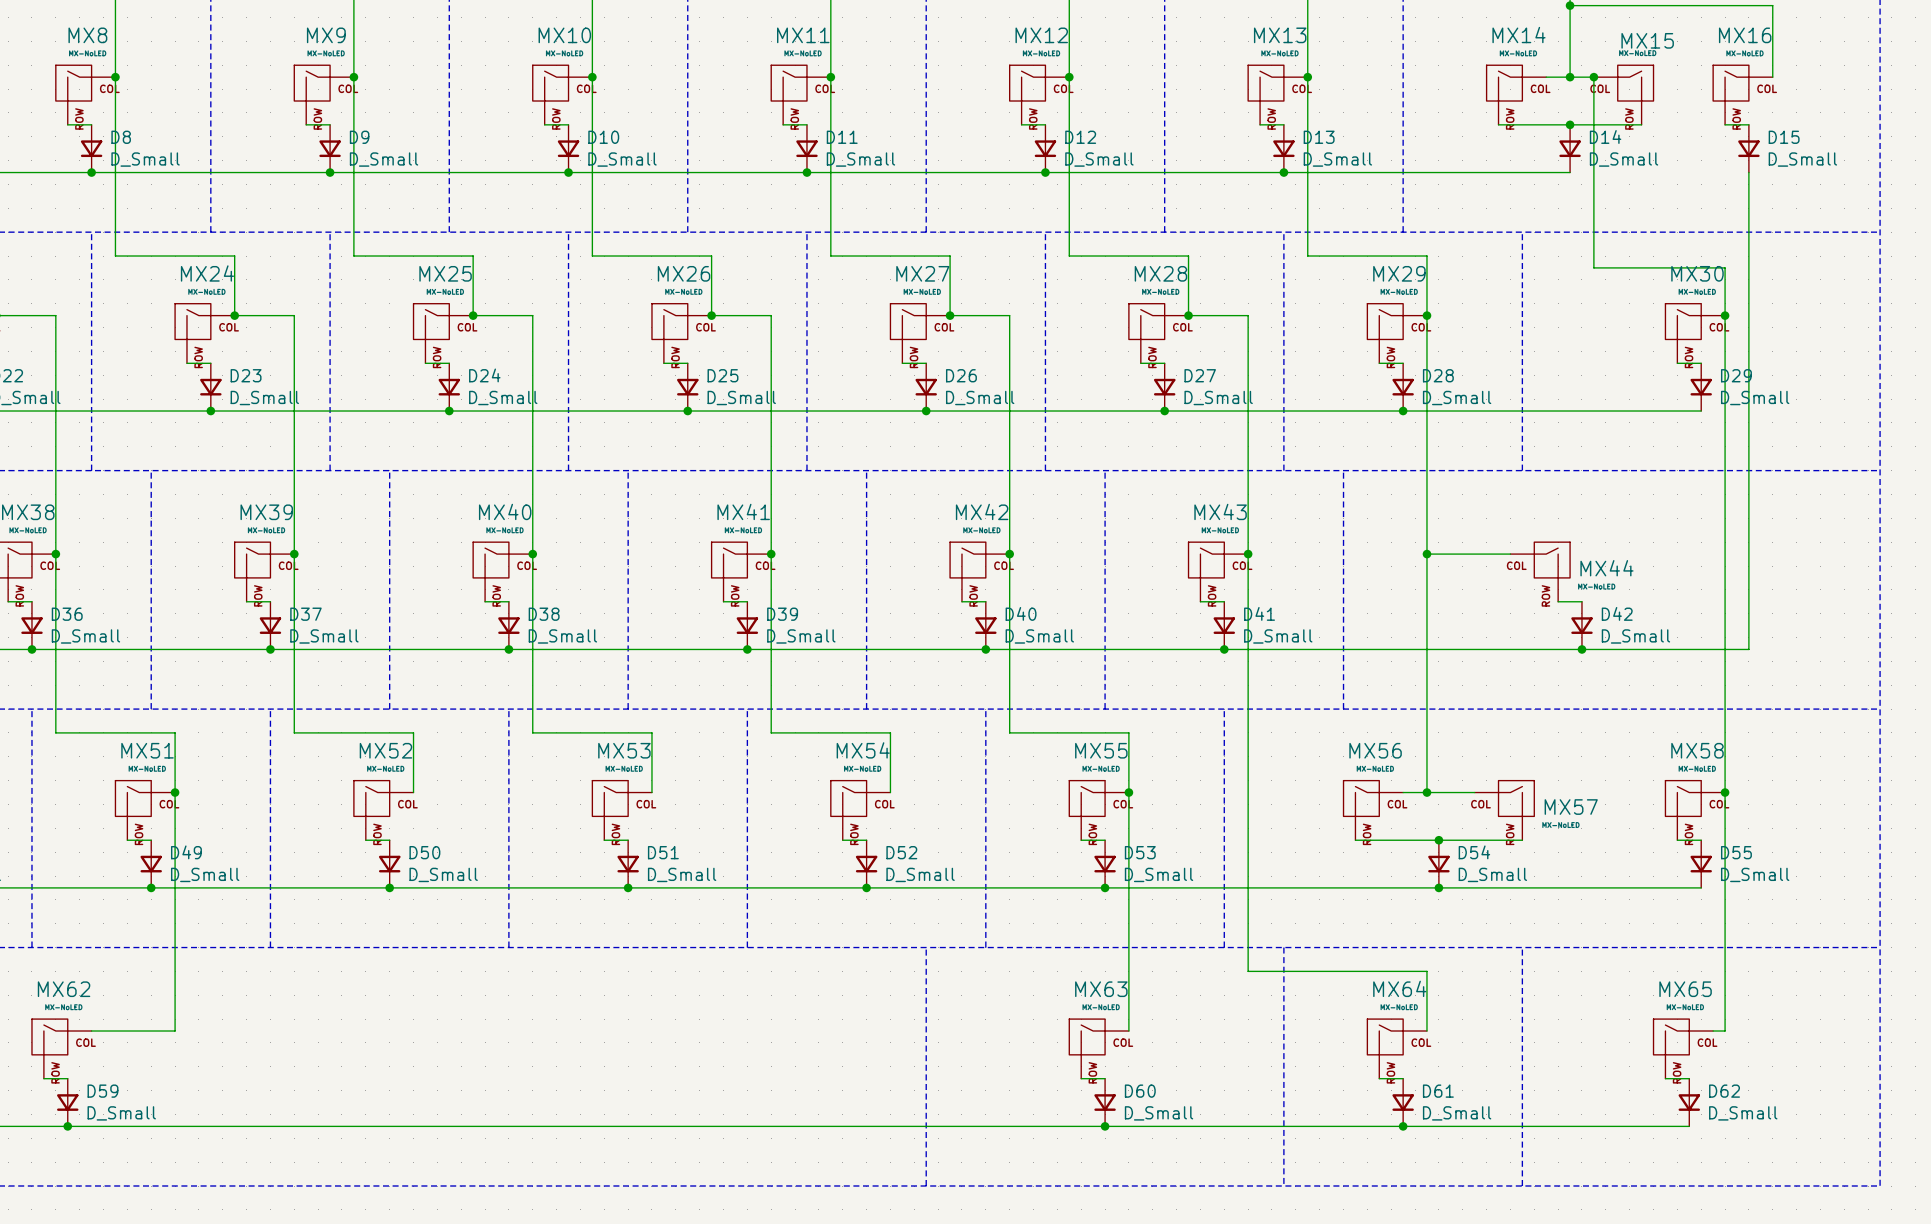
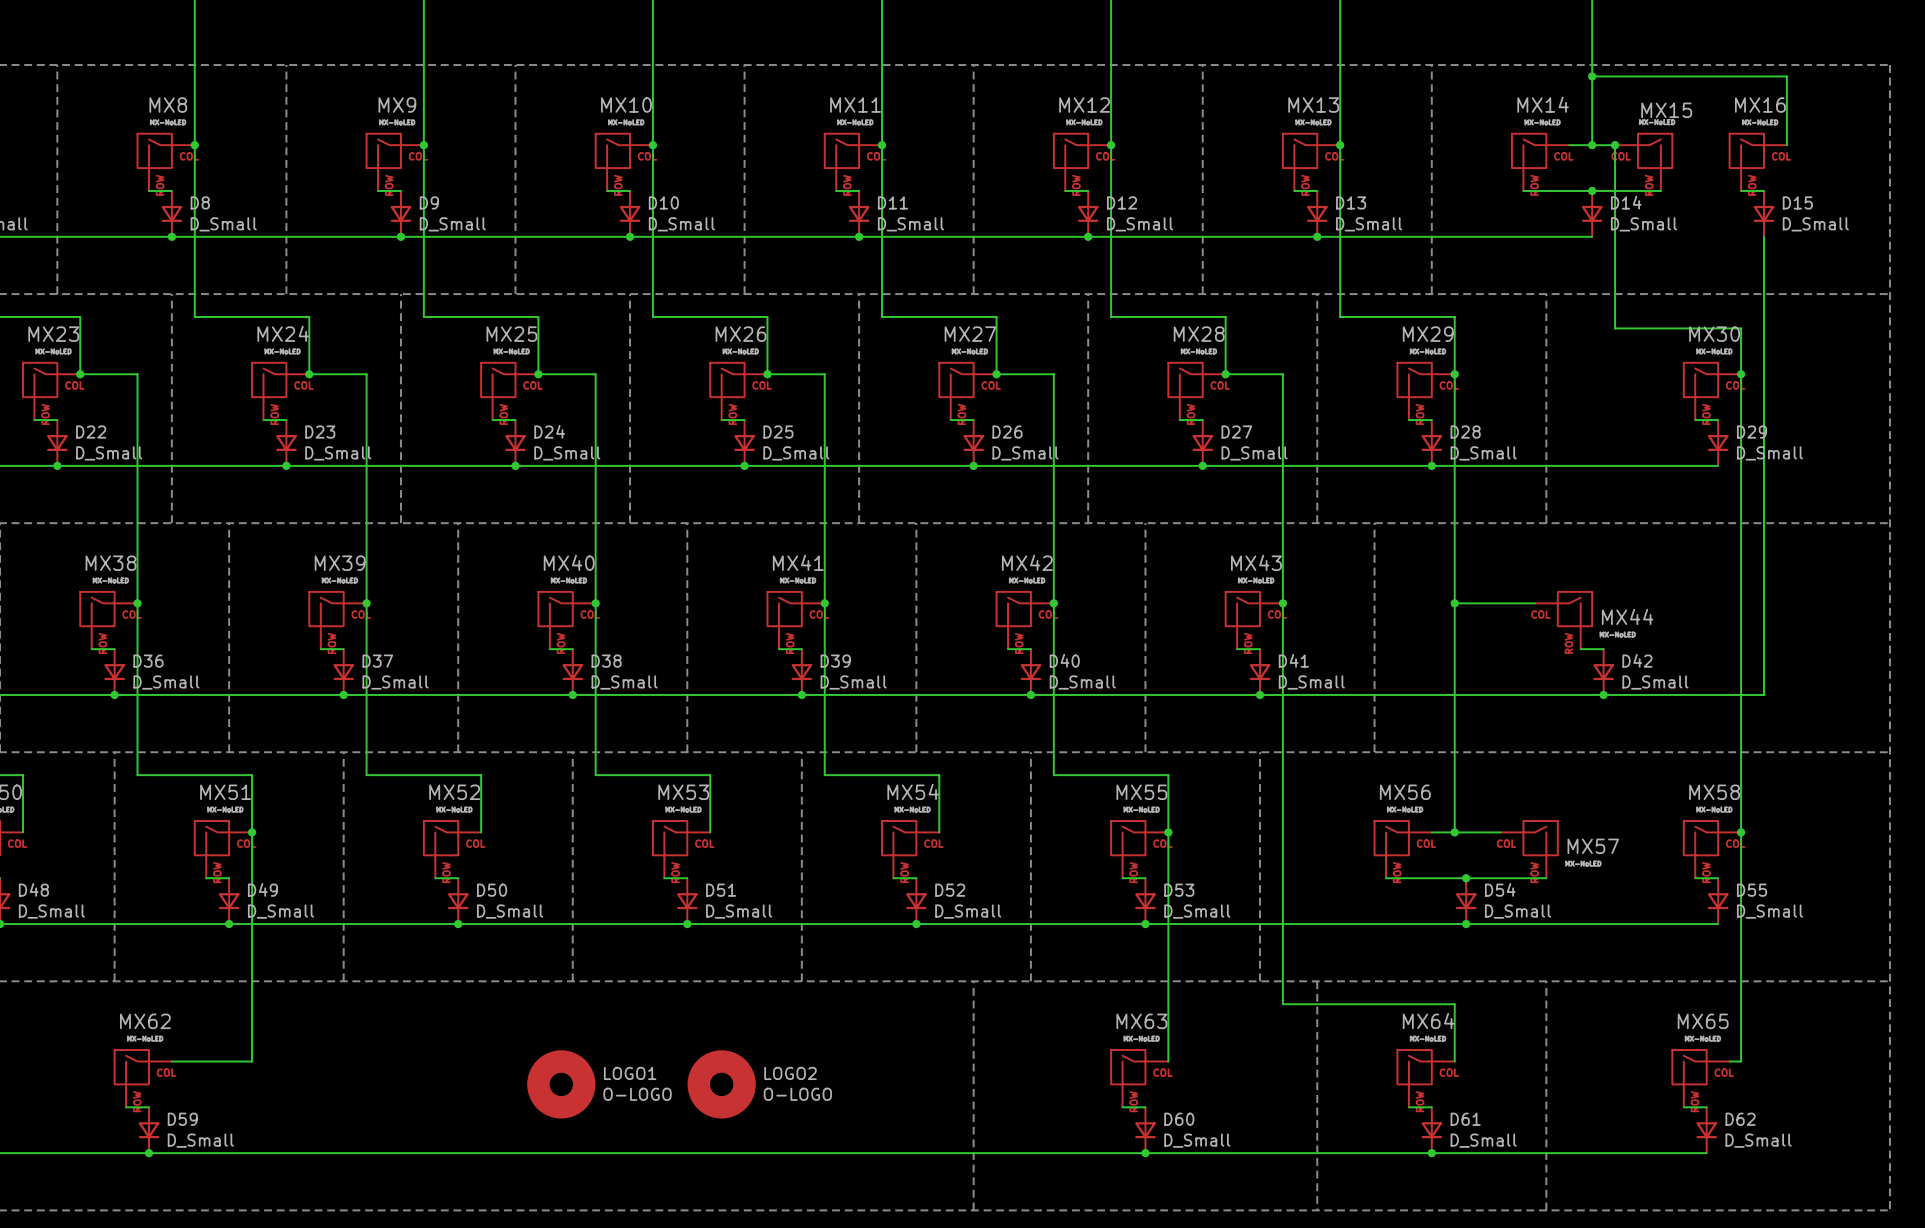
LOGO1: none -> O-LOGO (561, 1084)
LOGO2: none -> O-LOGO (721, 1084)

